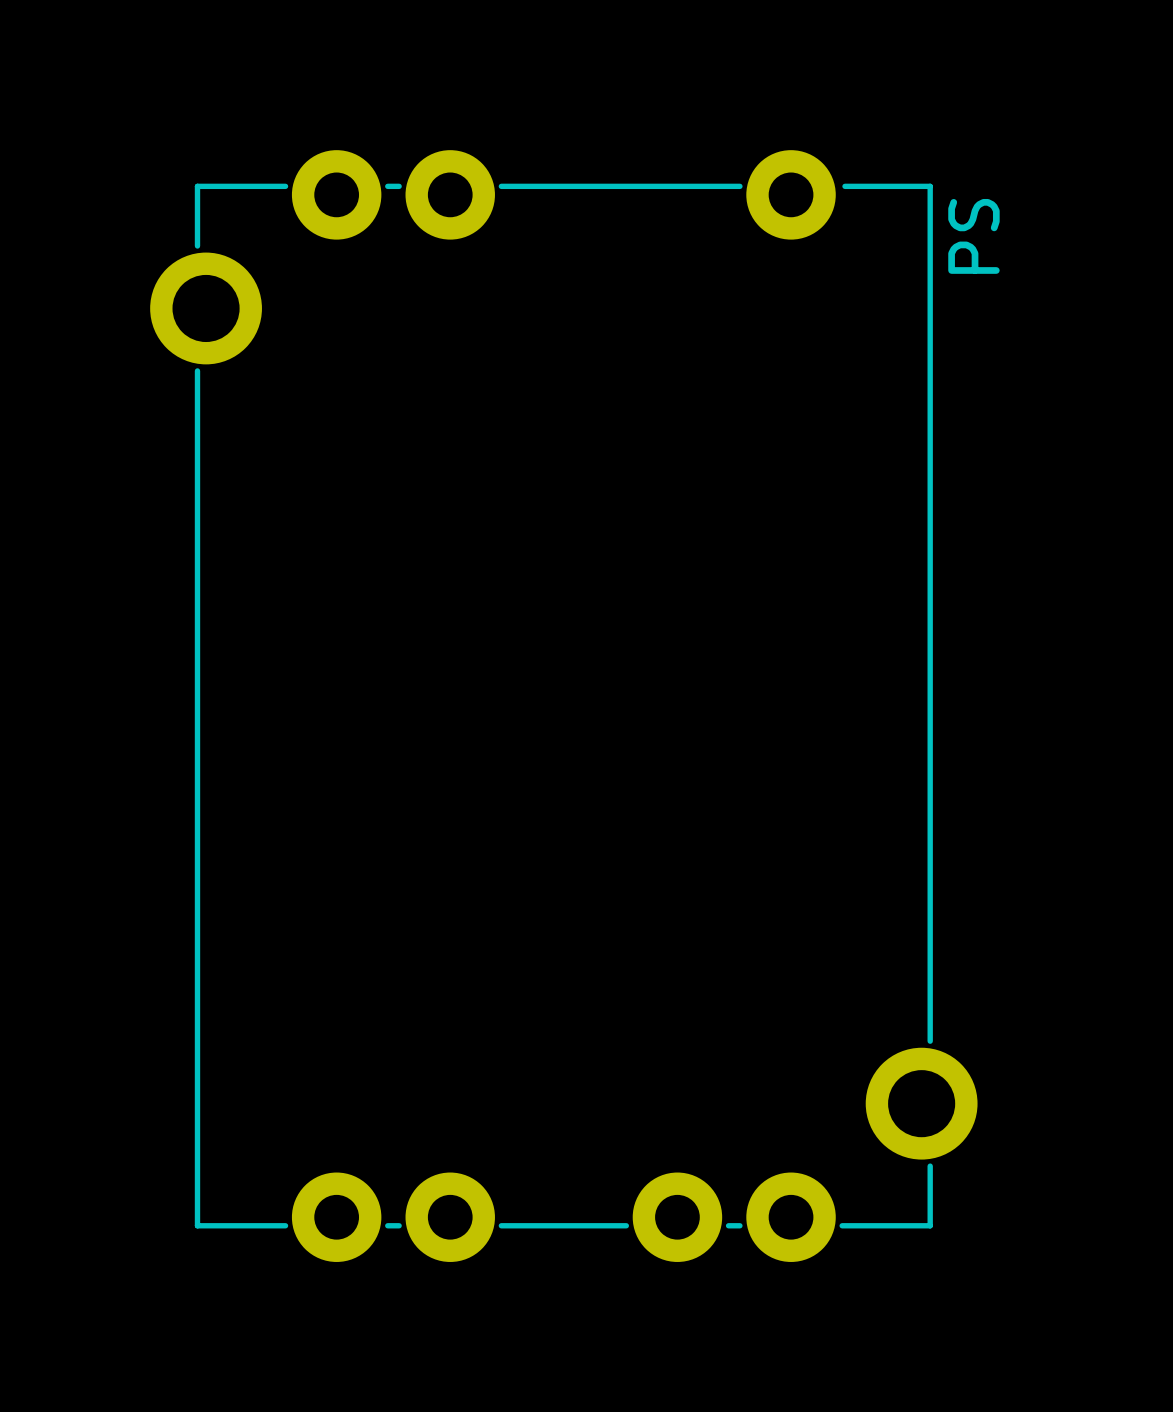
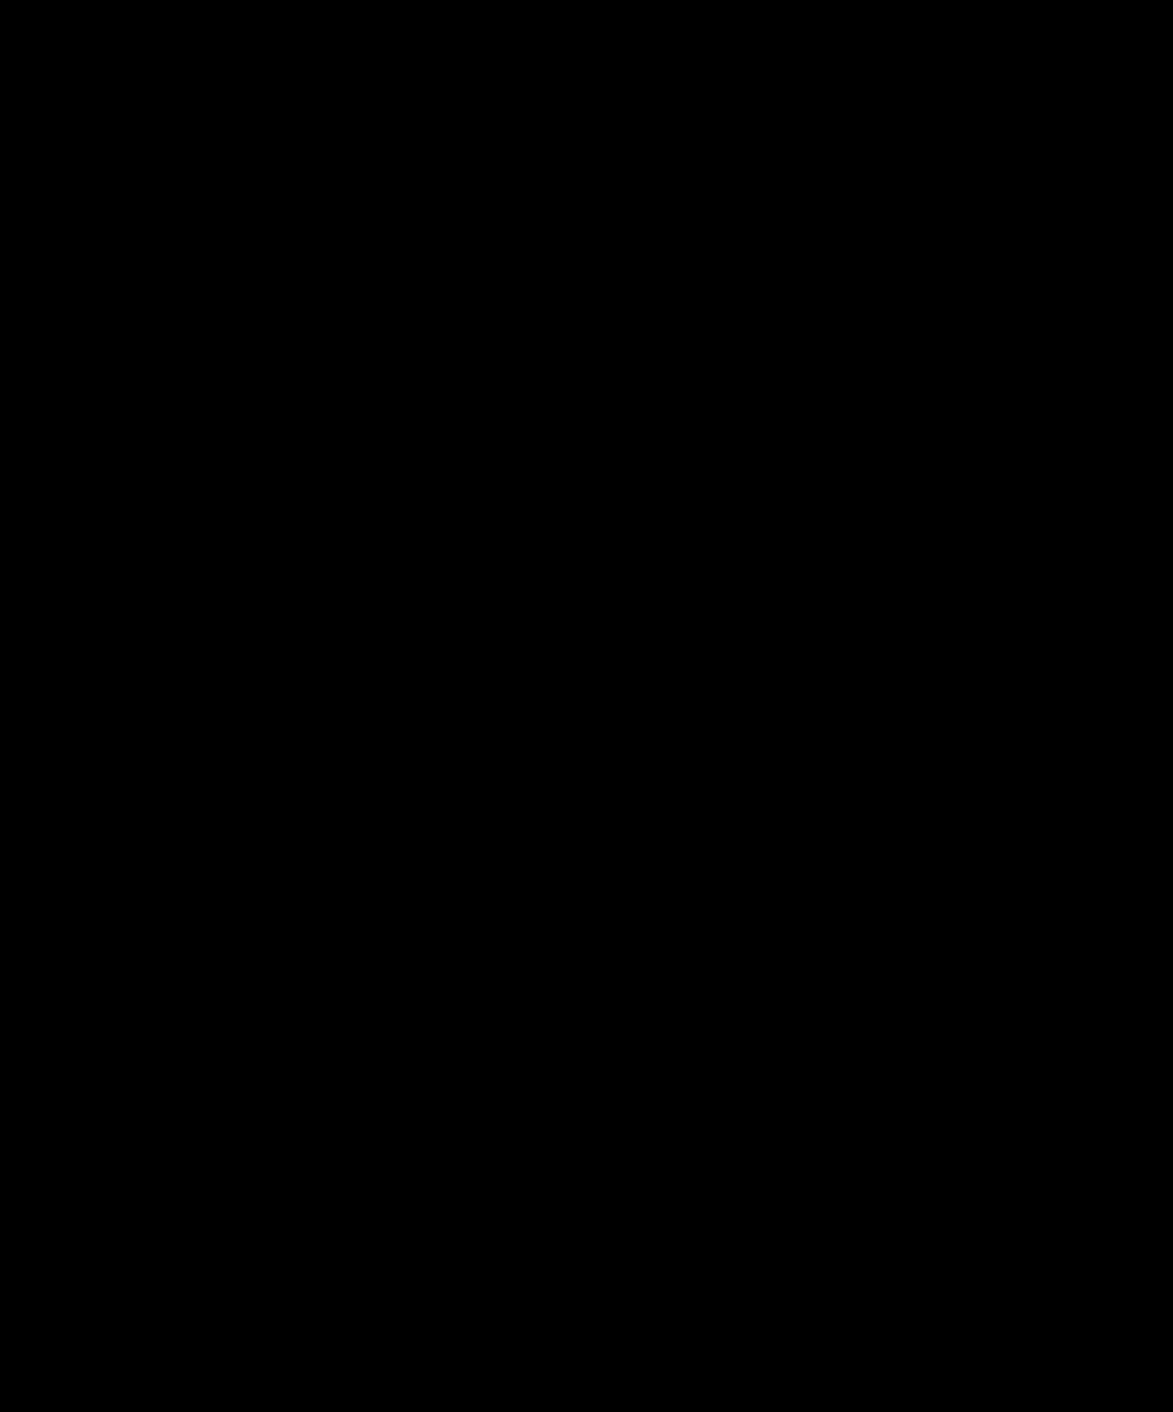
PS: (563, 706) -> none

